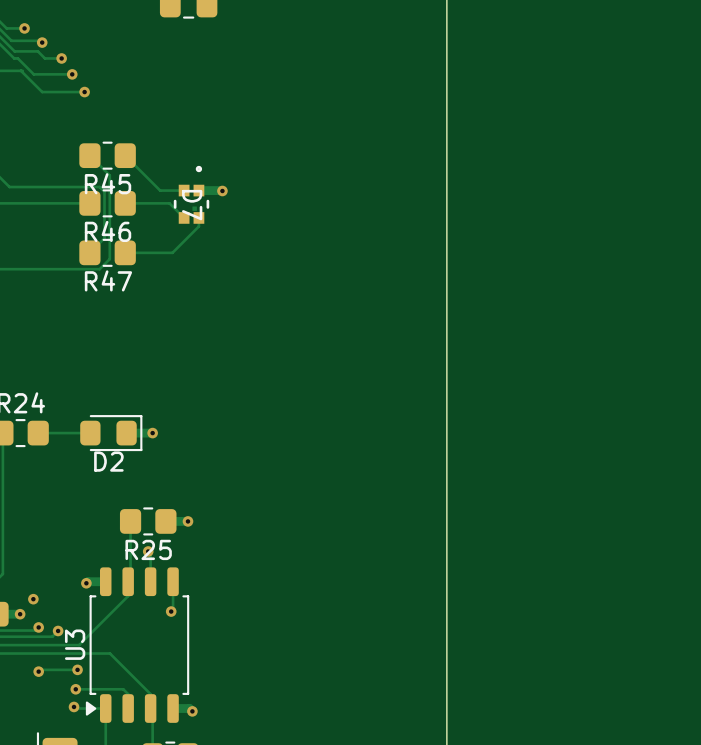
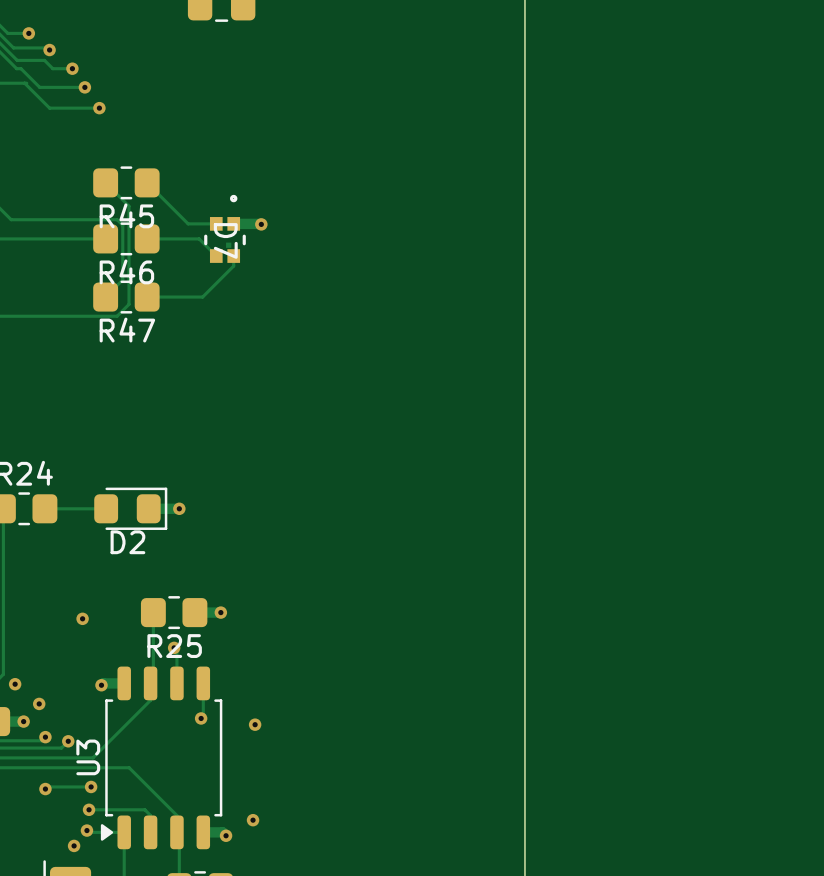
via: none -> (82, 618)
via: none -> (15, 684)
via: none -> (255, 724)
via: none -> (253, 820)
via: none -> (74, 845)

